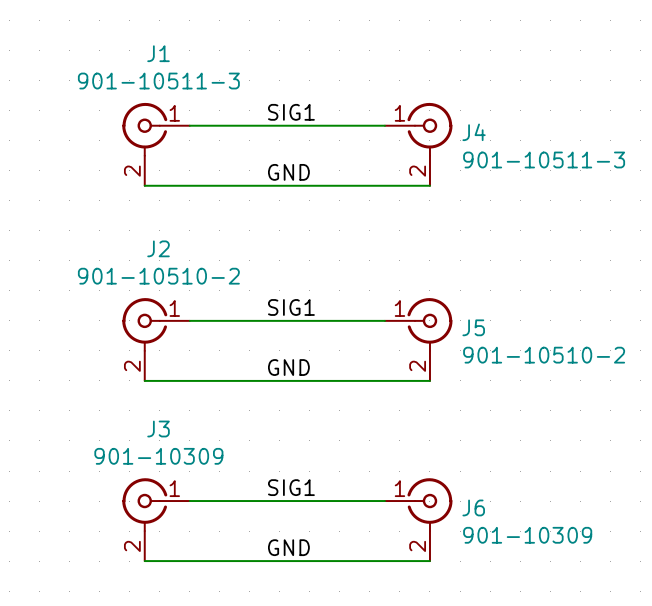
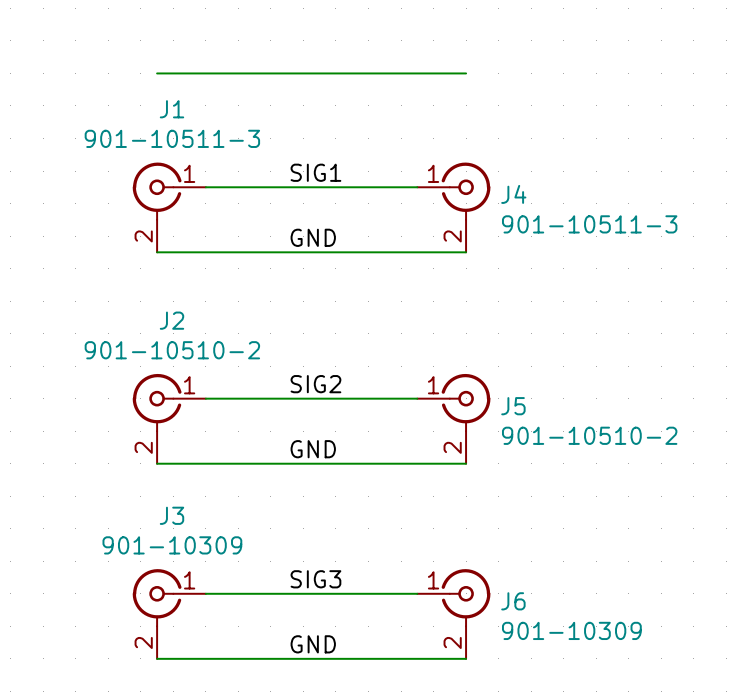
wire: none -> (157, 73) (466, 73)
label: SIG1 (291, 307) -> SIG2 (315, 384)
label: SIG1 (291, 487) -> SIG3 (315, 579)

